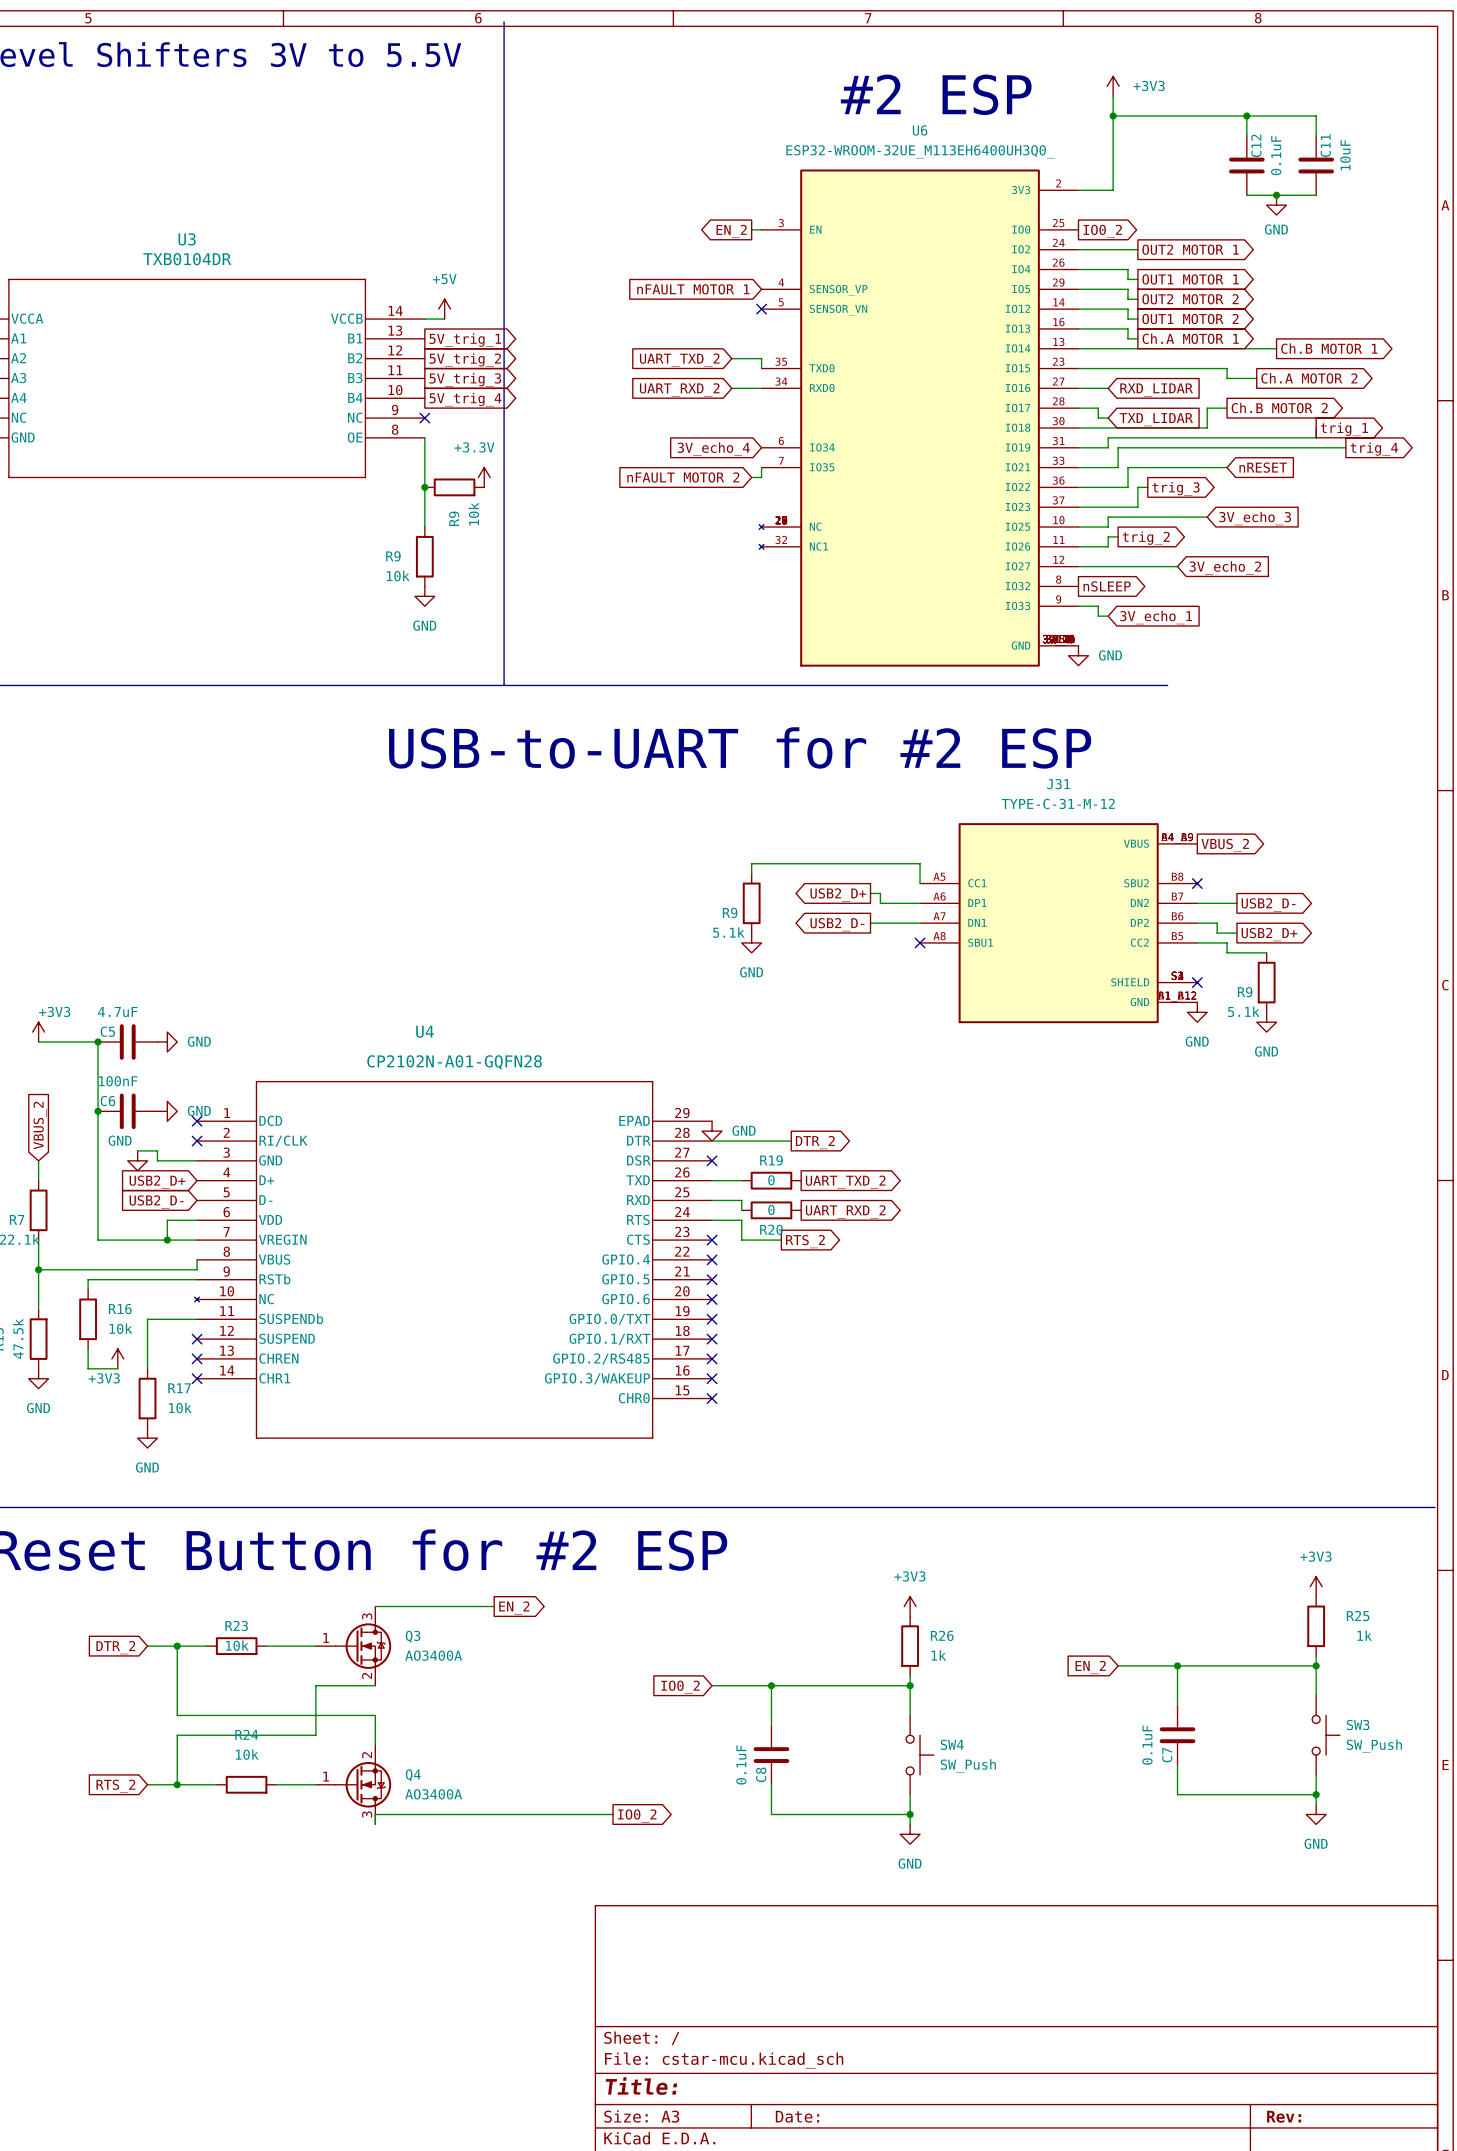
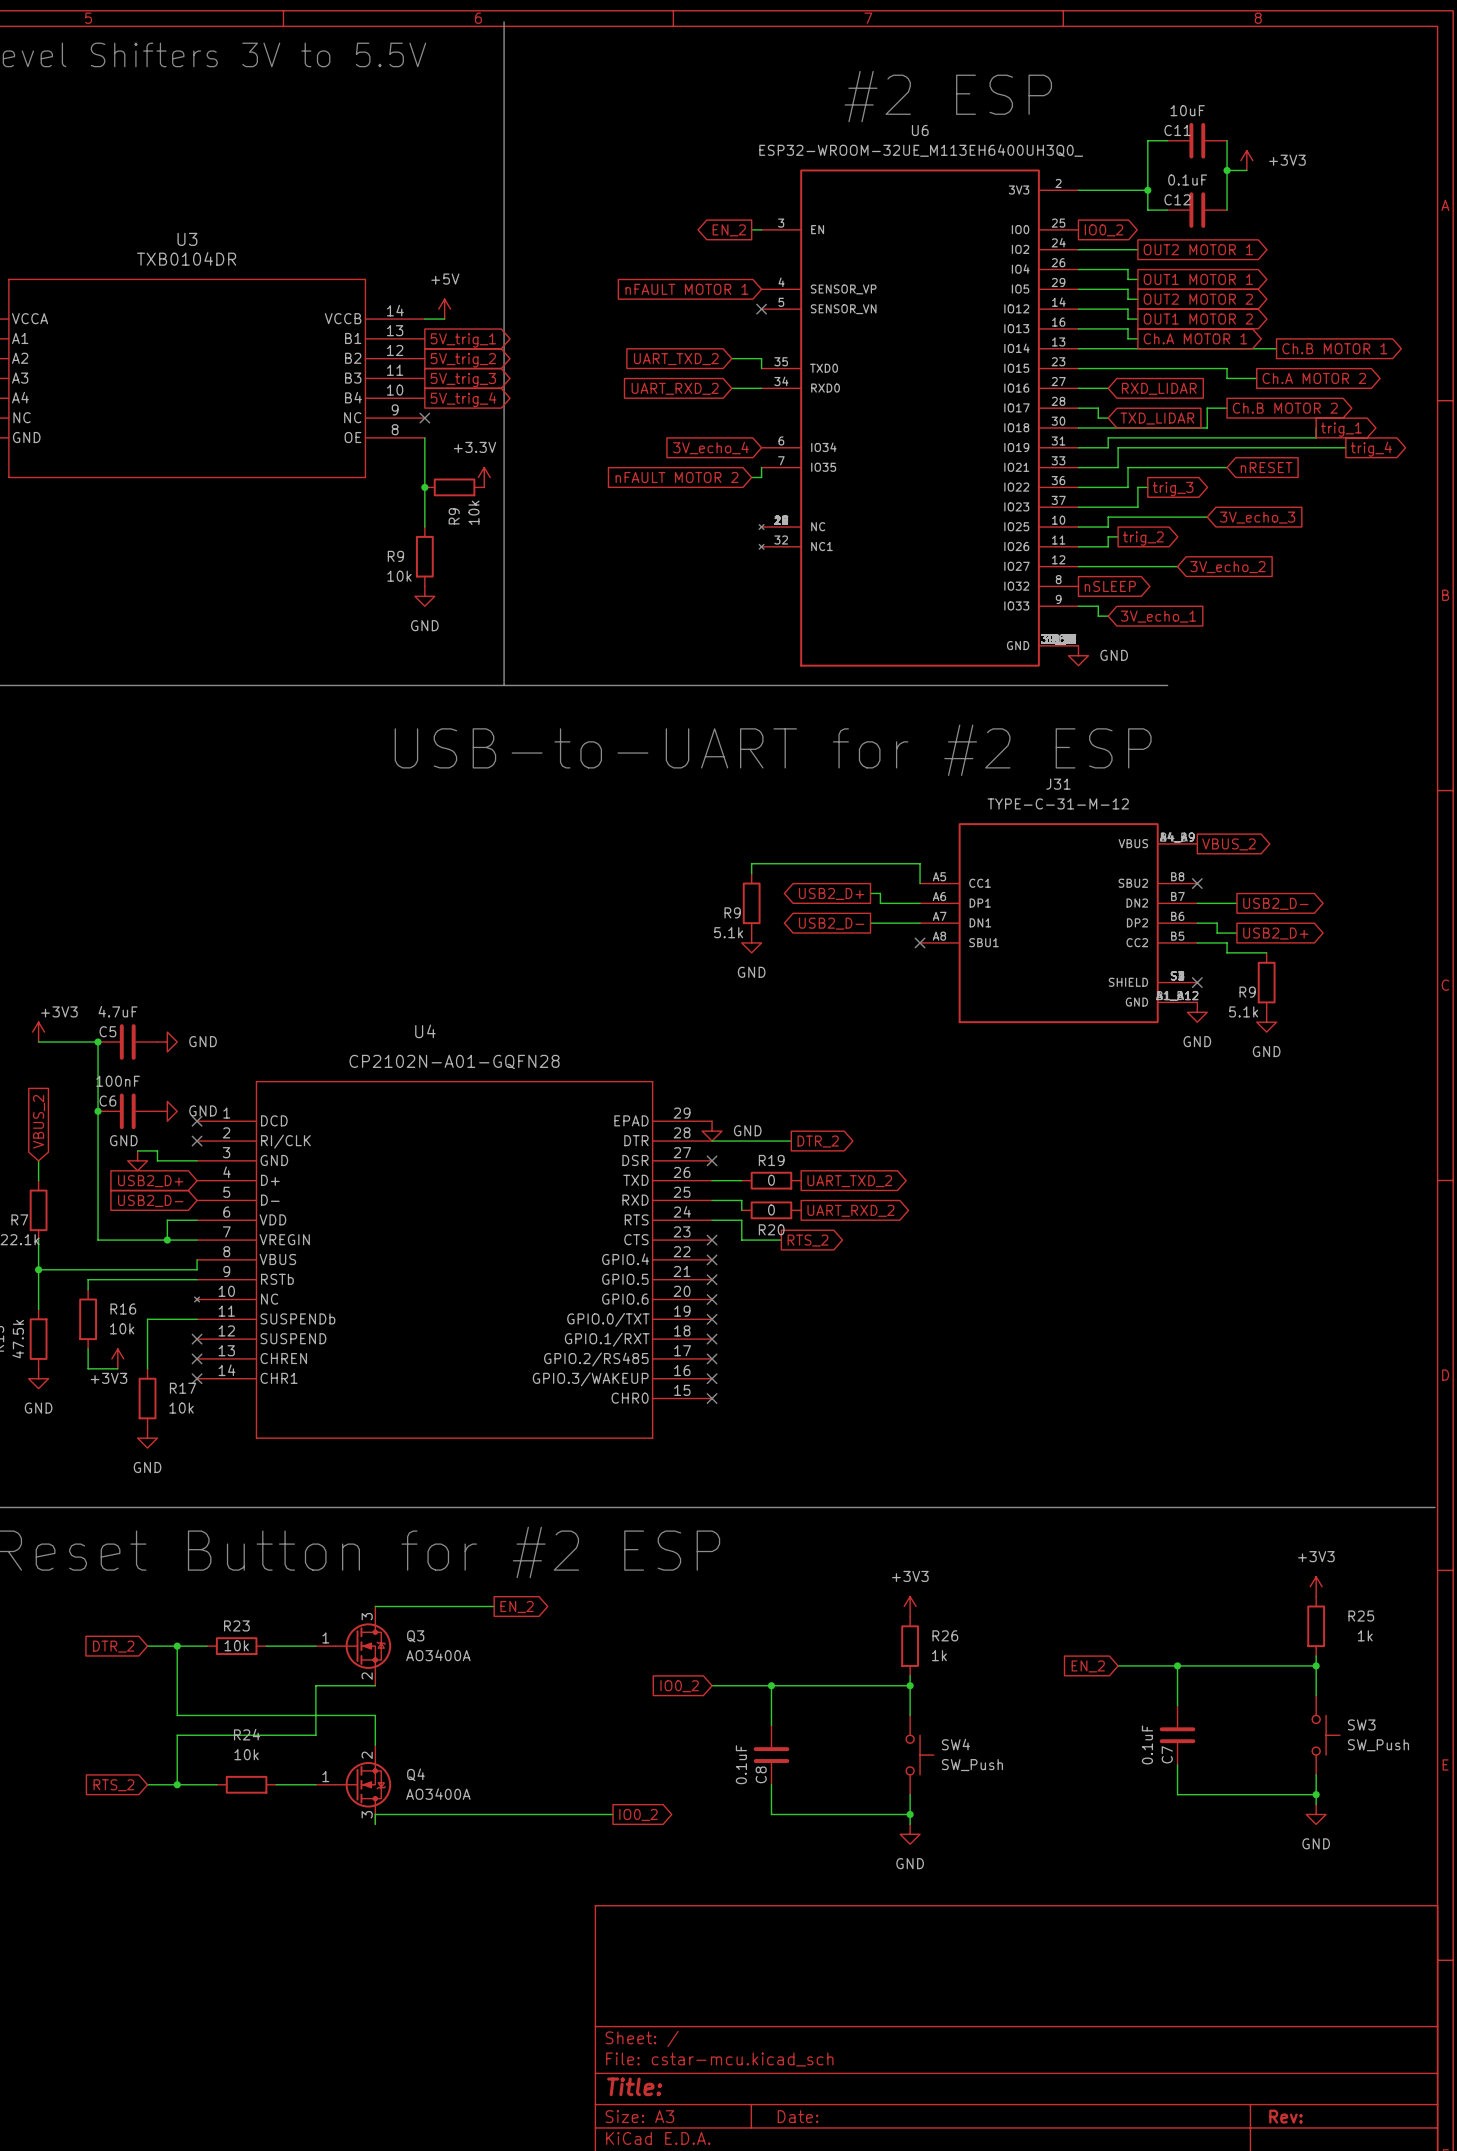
power symbol position: +3V3 (1113, 86) -> +3V3 (1246, 160)
wire: (1113, 96) (1113, 190) -> (1147, 190) (1113, 190)
wire: (1113, 116) (1316, 116) (1316, 135) -> none
junction: (1113, 116) -> none
wire: (1246, 116) (1246, 135) -> none
junction: (1246, 116) -> none
wire: none -> (1167, 140) (1147, 140) (1147, 210) (1167, 210)
wire: none -> (1227, 140) (1227, 210)
C12 name position: C12 (1256, 145) -> C12 (1177, 199)
C11 name position: C11 (1325, 145) -> C11 (1177, 130)
C12 value position: 0.1uF (1276, 155) -> 0.1uF (1187, 180)
C11 value position: 10uF (1345, 155) -> 10uF (1187, 110)
C12 rotation: 0° (1246, 165) -> 90° clockwise (1197, 210)
C12 position: (1246, 165) -> (1197, 210)
C11 rotation: 0° (1316, 165) -> 90° clockwise (1197, 140)
C11 position: (1316, 165) -> (1197, 140)
junction: none -> (1227, 170)
junction: none -> (1147, 190)
wire: (1246, 195) (1316, 195) -> none
junction: (1276, 195) -> none
power symbol: GND (1276, 205) -> none

